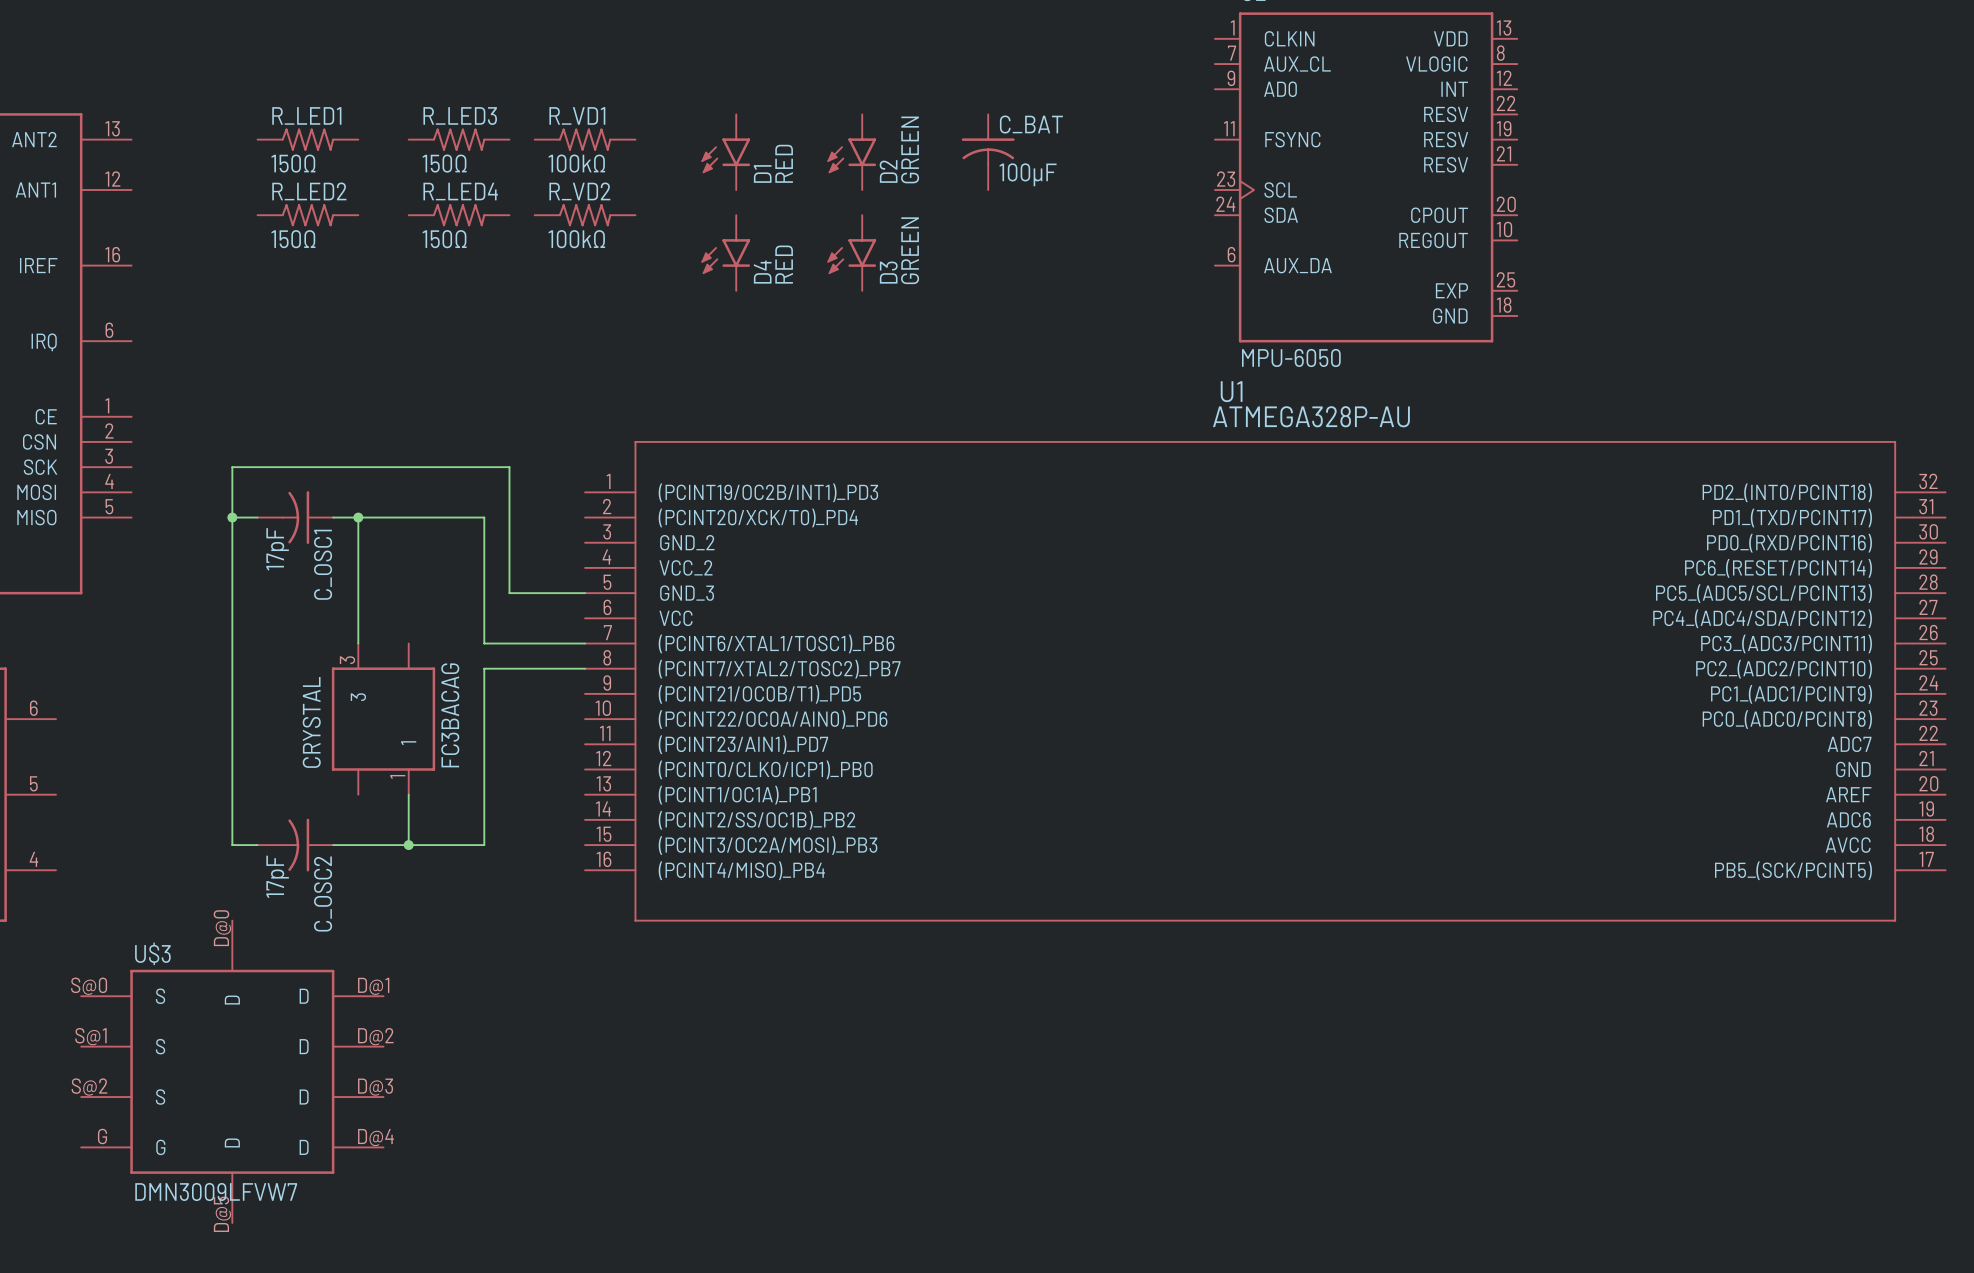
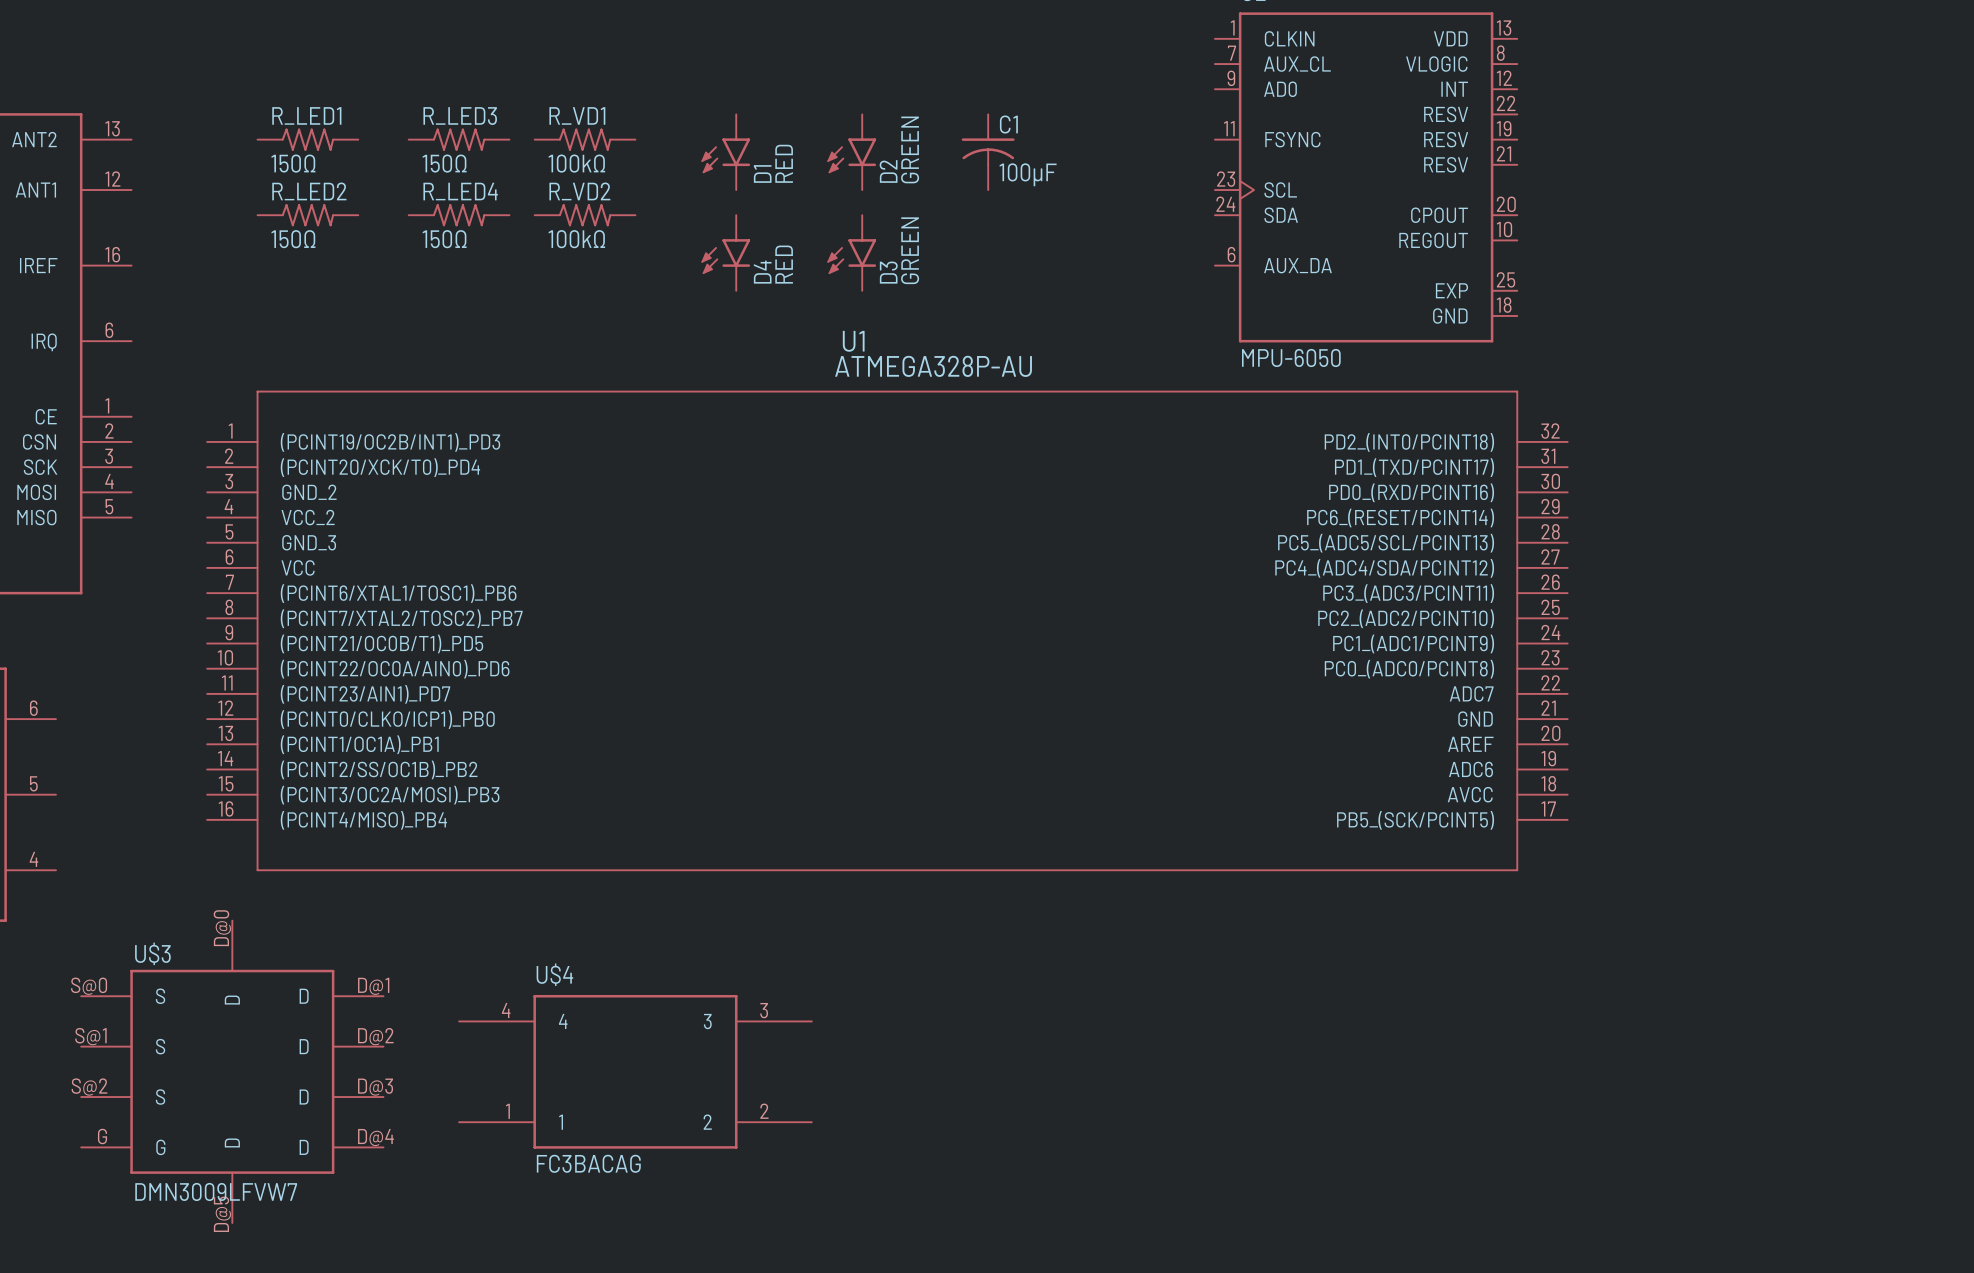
C_BAT name: C_BAT (1031, 124) -> C1 (1008, 124)
junction: (232, 517) -> none
C_OSC1: 17pF (295, 517) -> none
wire: (333, 517) (484, 517) (484, 643) (585, 643) -> none
wire: (358, 517) (358, 643) -> none
junction: (358, 517) -> none
wire: (585, 593) (509, 593) (509, 467) (232, 467) (232, 845) (257, 845) -> none
wire: (585, 668) (484, 668) (484, 845) (333, 845) -> none
U1 position: (1265, 681) -> (887, 630)
CRYSTAL: FC3BACAG (383, 719) -> none
wire: (408, 794) (408, 845) -> none
C_OSC2: 17pF (295, 845) -> none
junction: (408, 845) -> none
U$4: none -> FC3BACAG (635, 1071)

